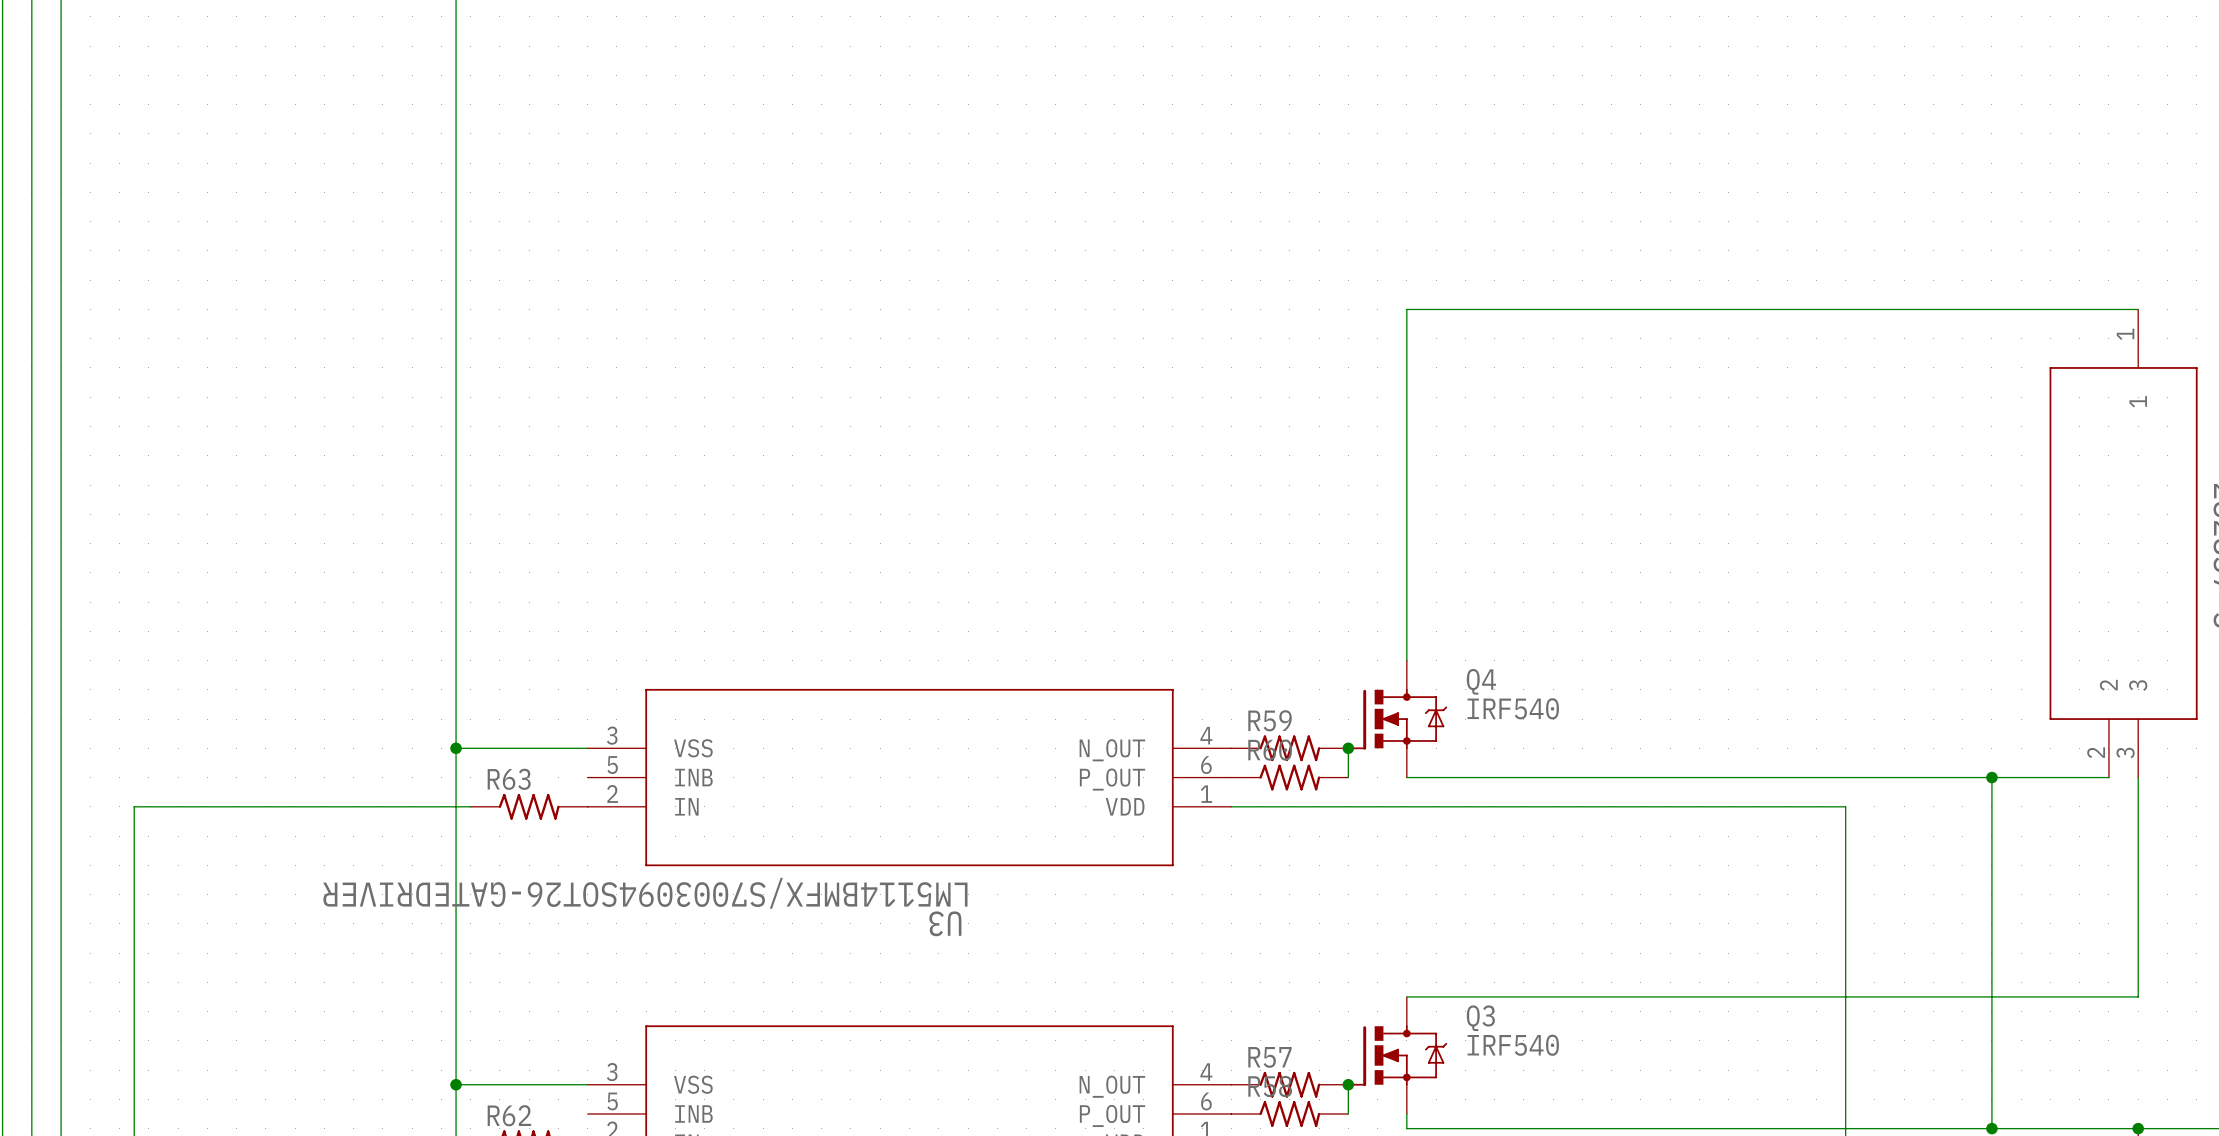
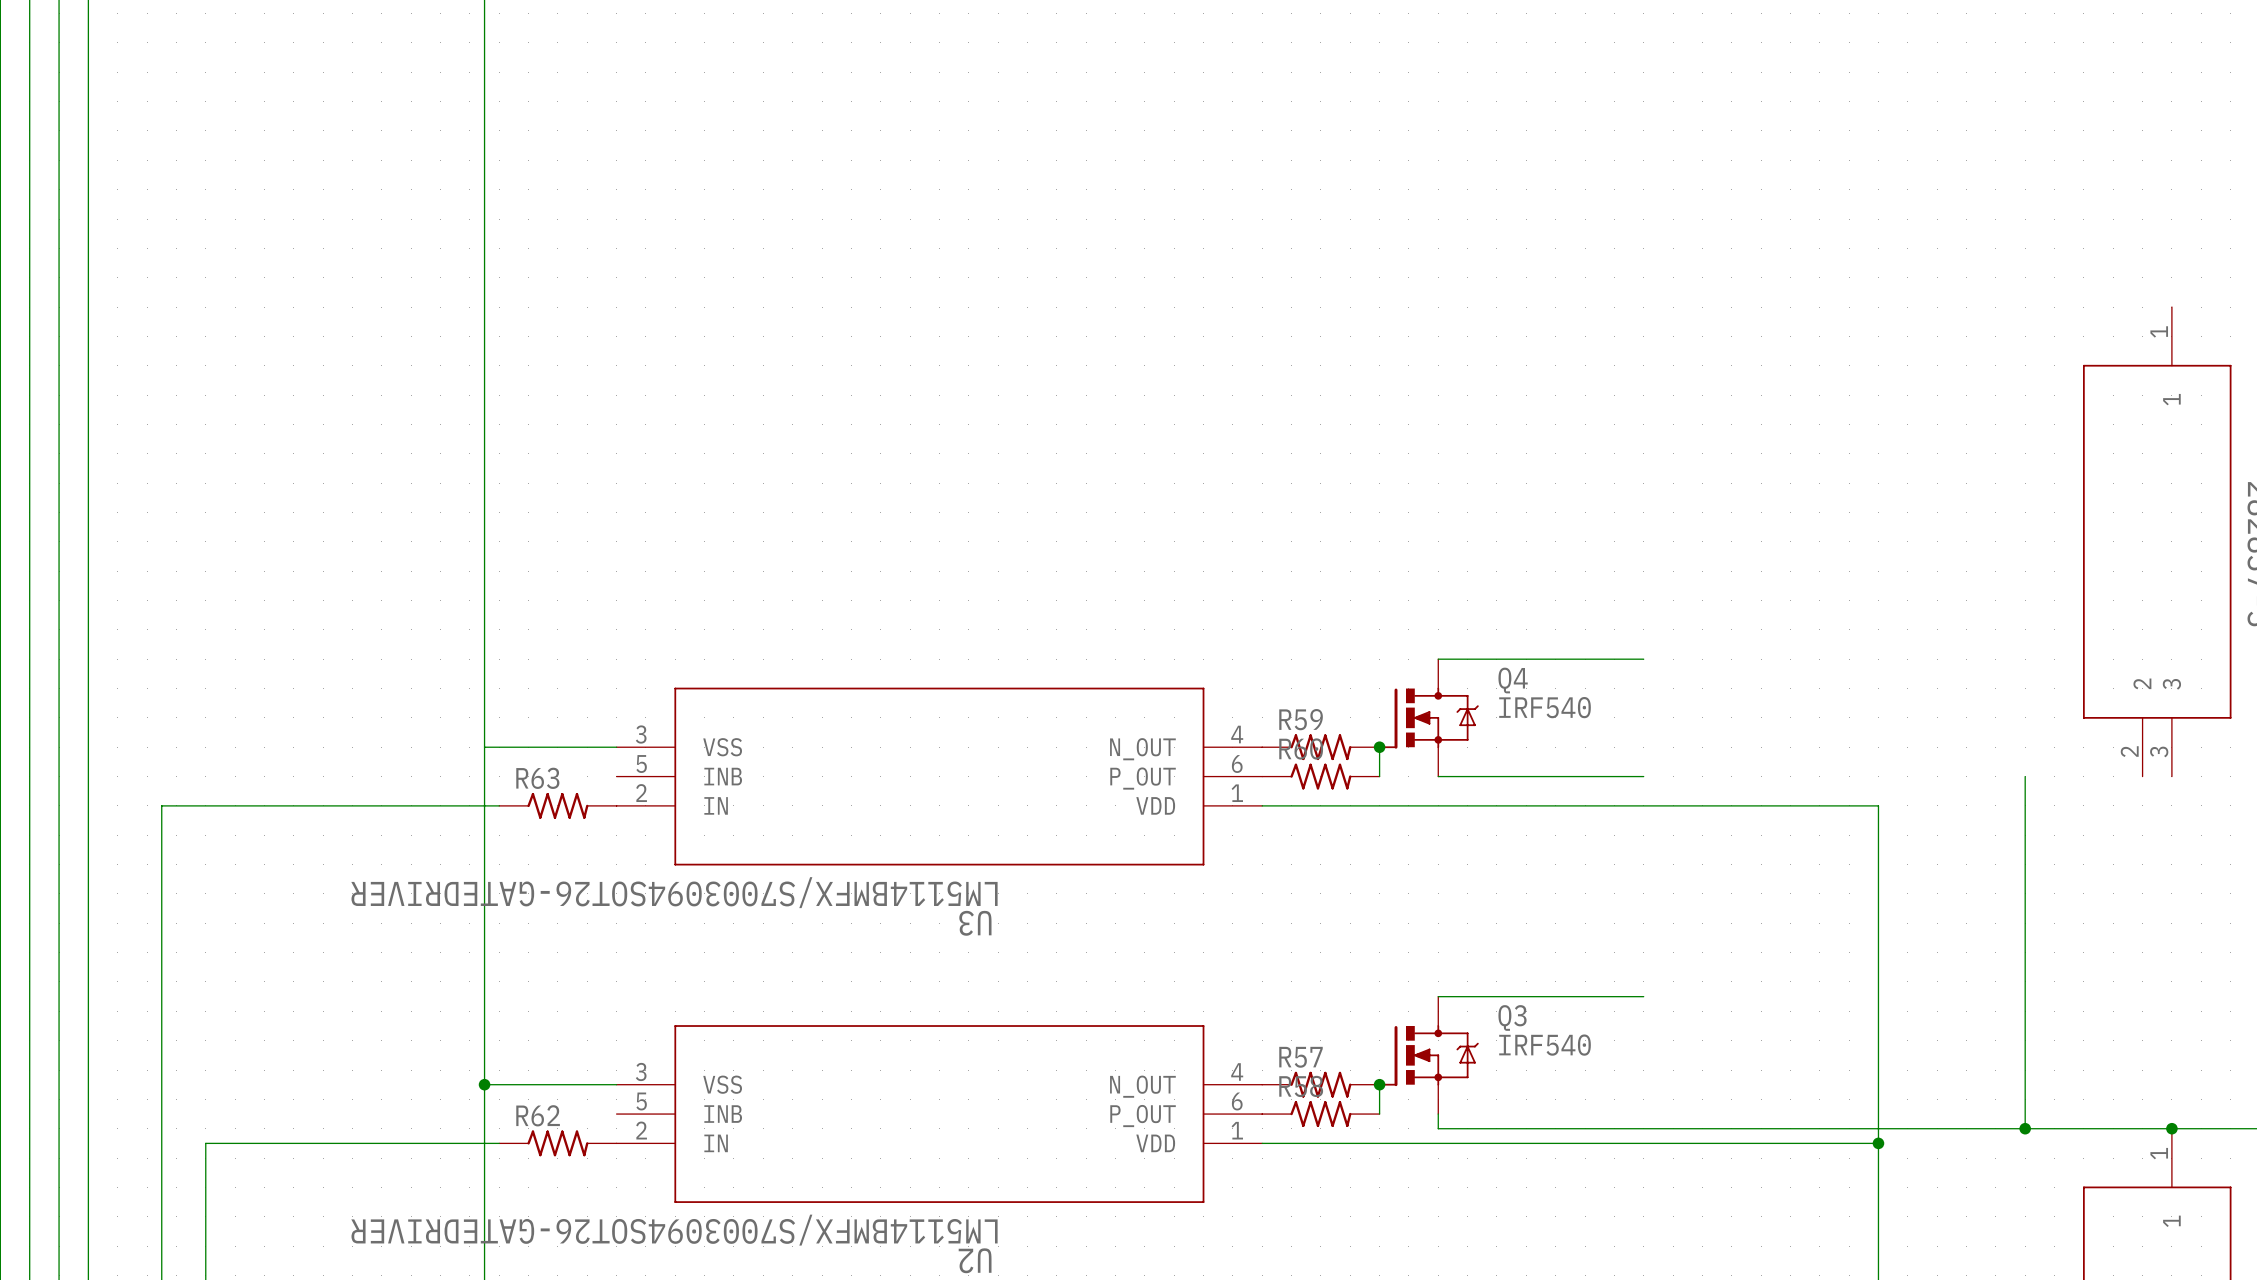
wire: (2138, 309) (1406, 309) (1406, 660) -> (1643, 659) (1438, 659)
junction: (456, 748) -> none
wire: (1611, 777) (2108, 777) -> none
junction: (1991, 777) -> none
wire: (2138, 777) (2138, 996) (1611, 996) -> none

